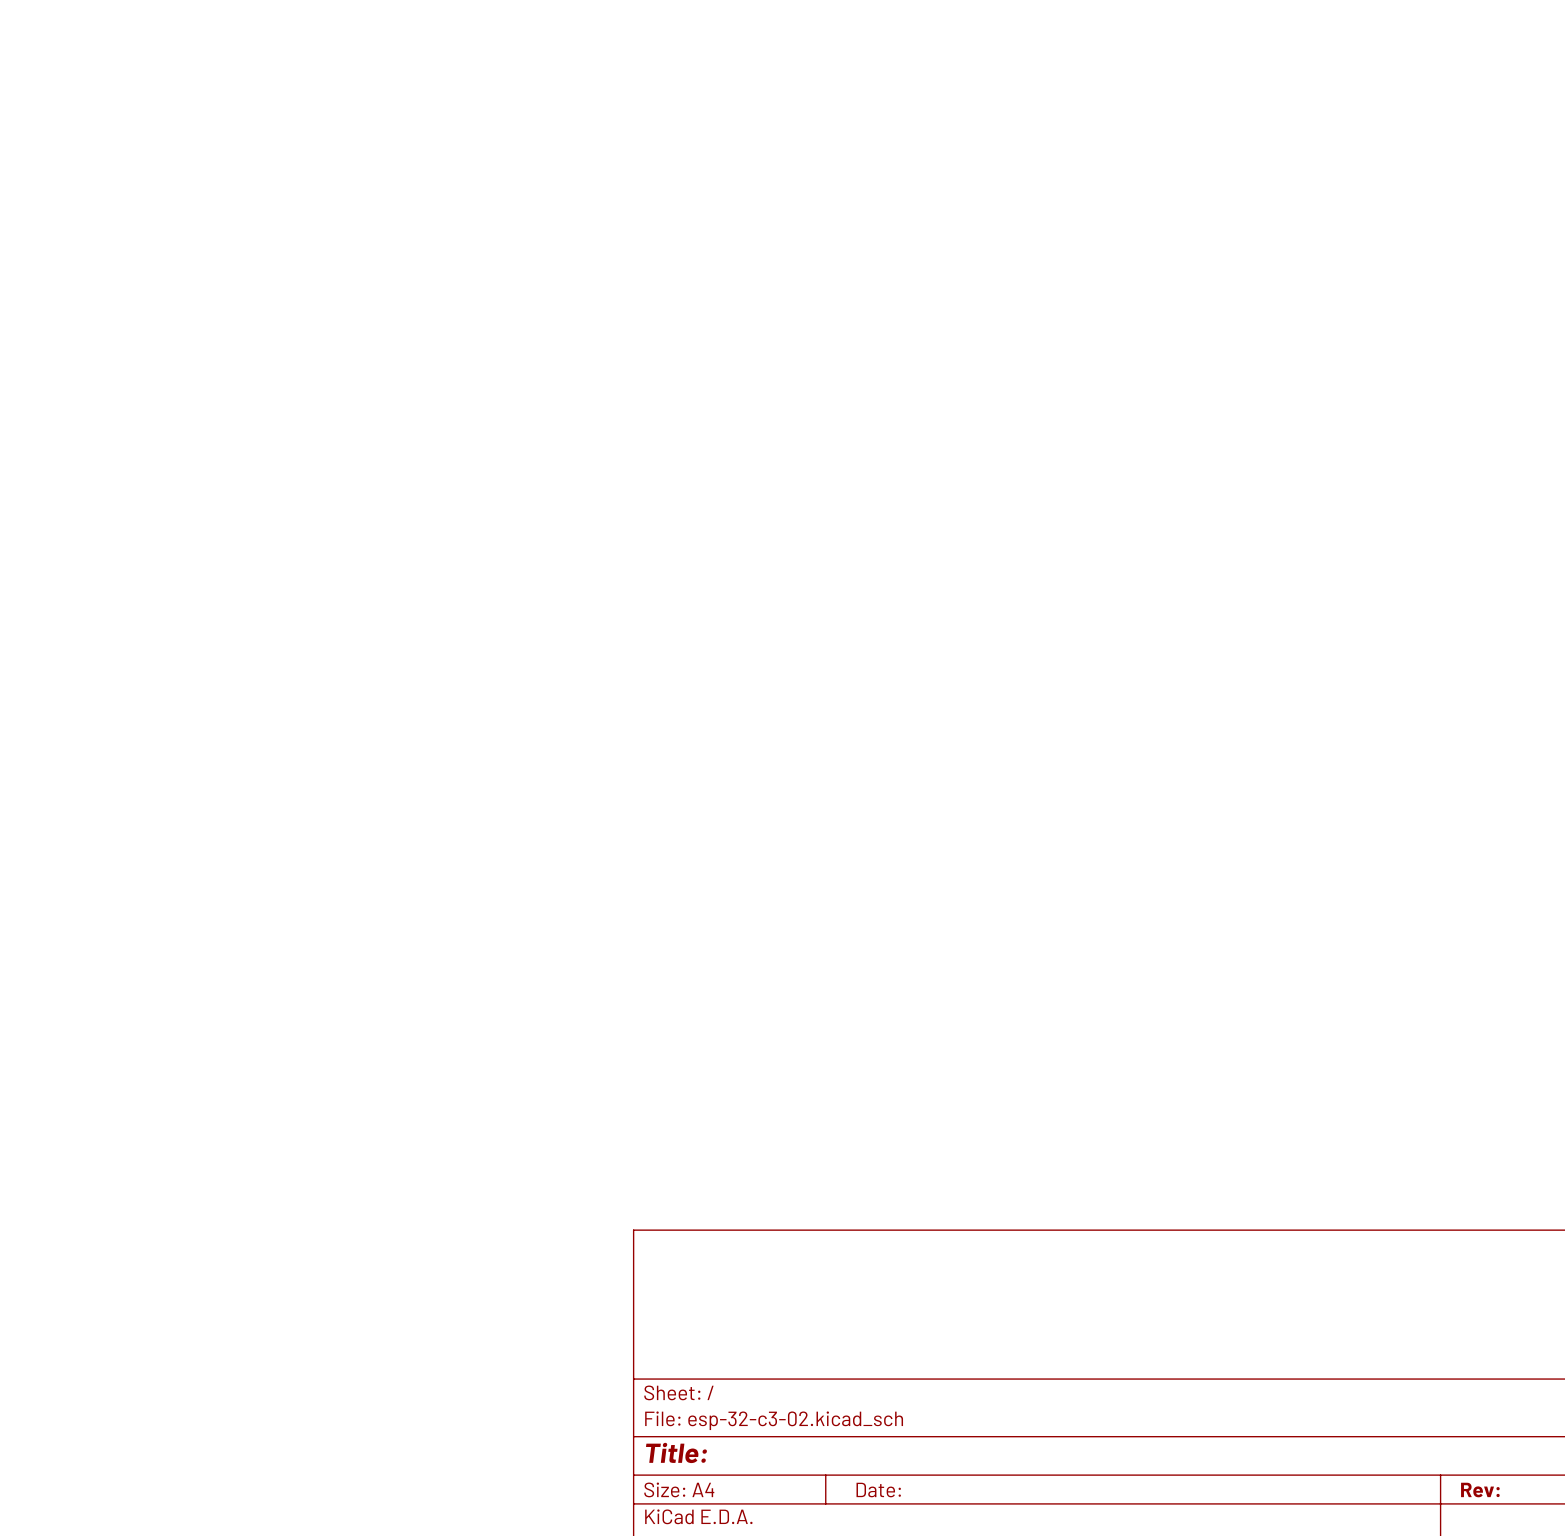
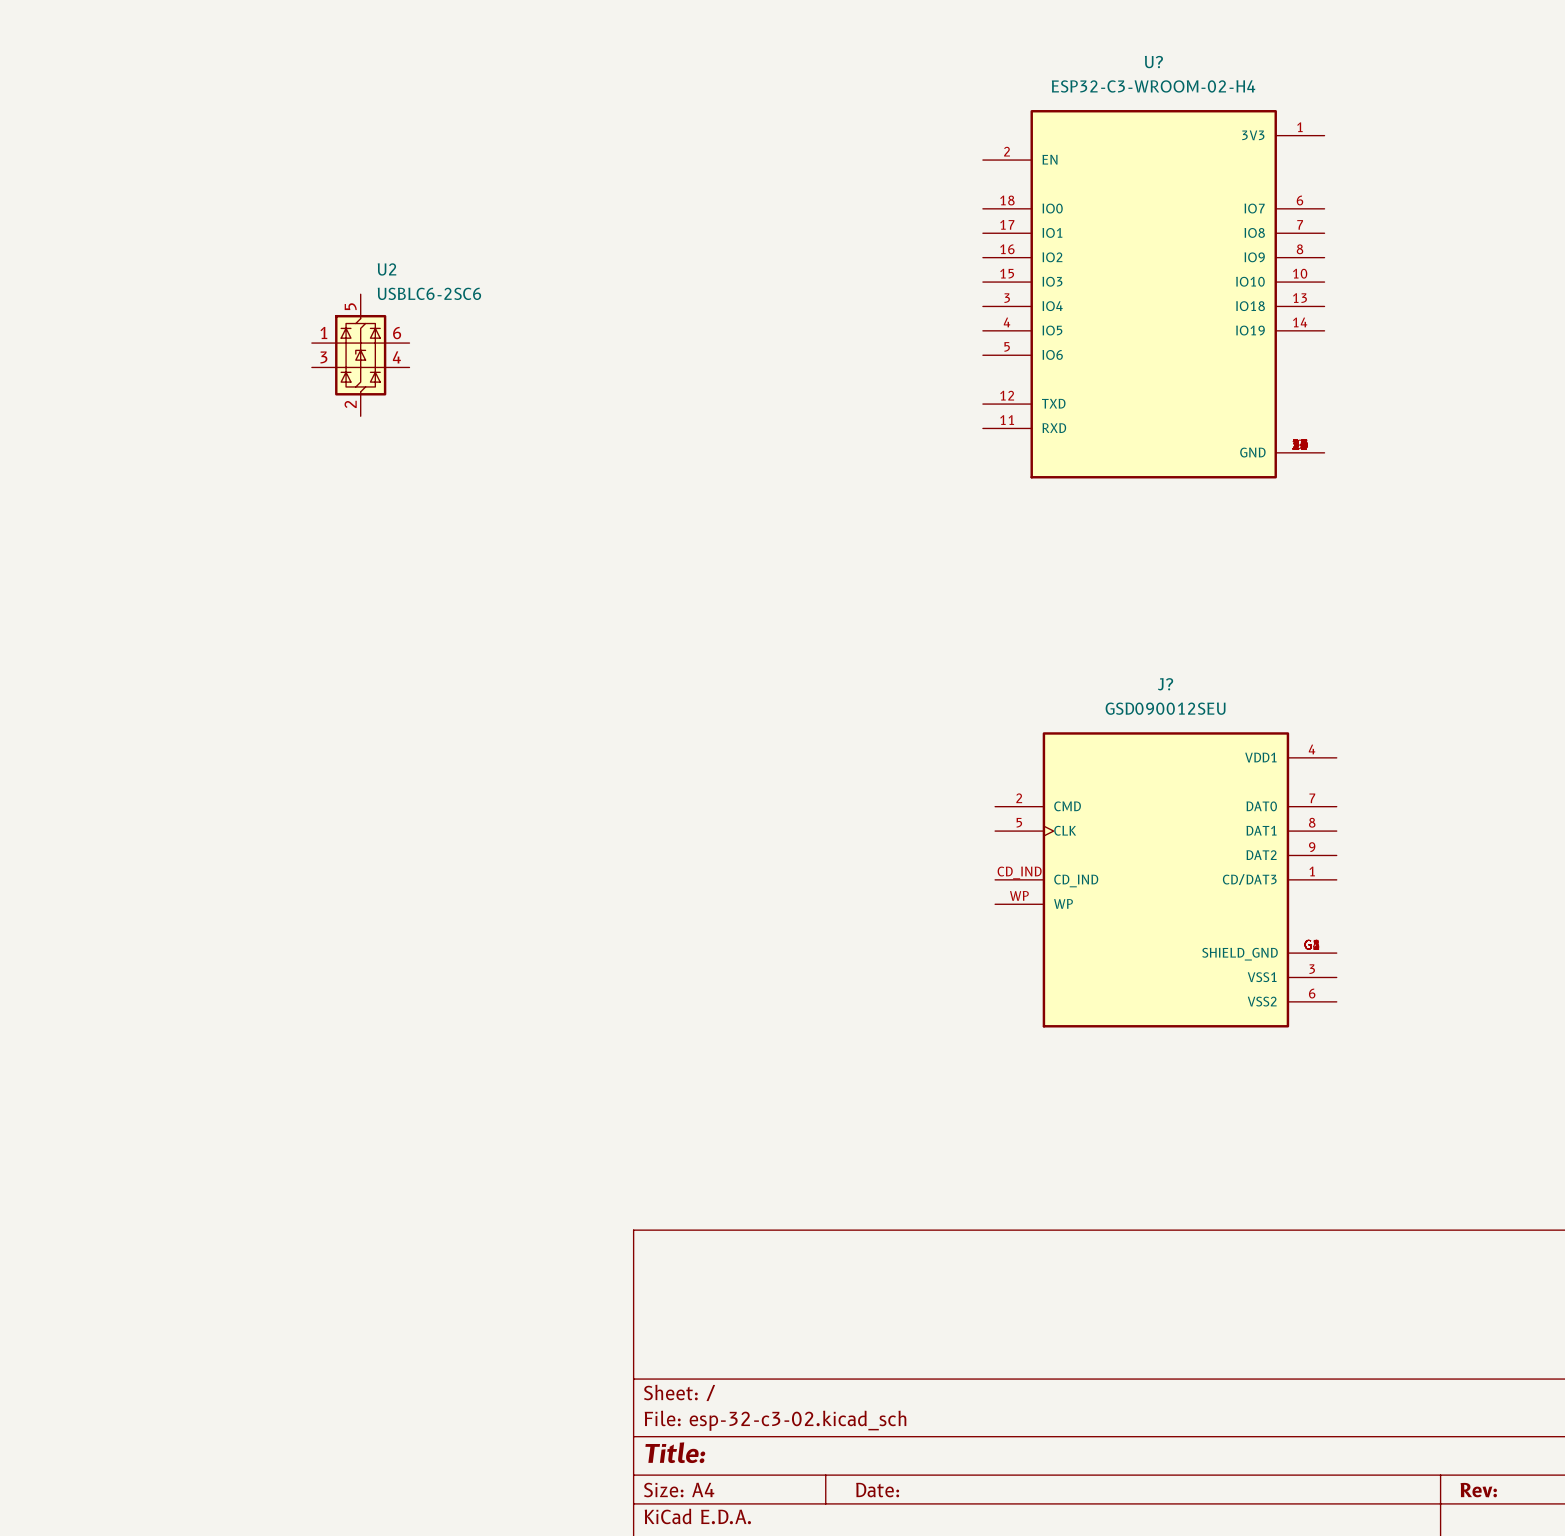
U?: none -> ESP32-C3-WROOM-02-H4 (1153, 294)
U2: none -> USBLC6-2SC6 (360, 355)
J?: none -> GSD090012SEU (1165, 879)

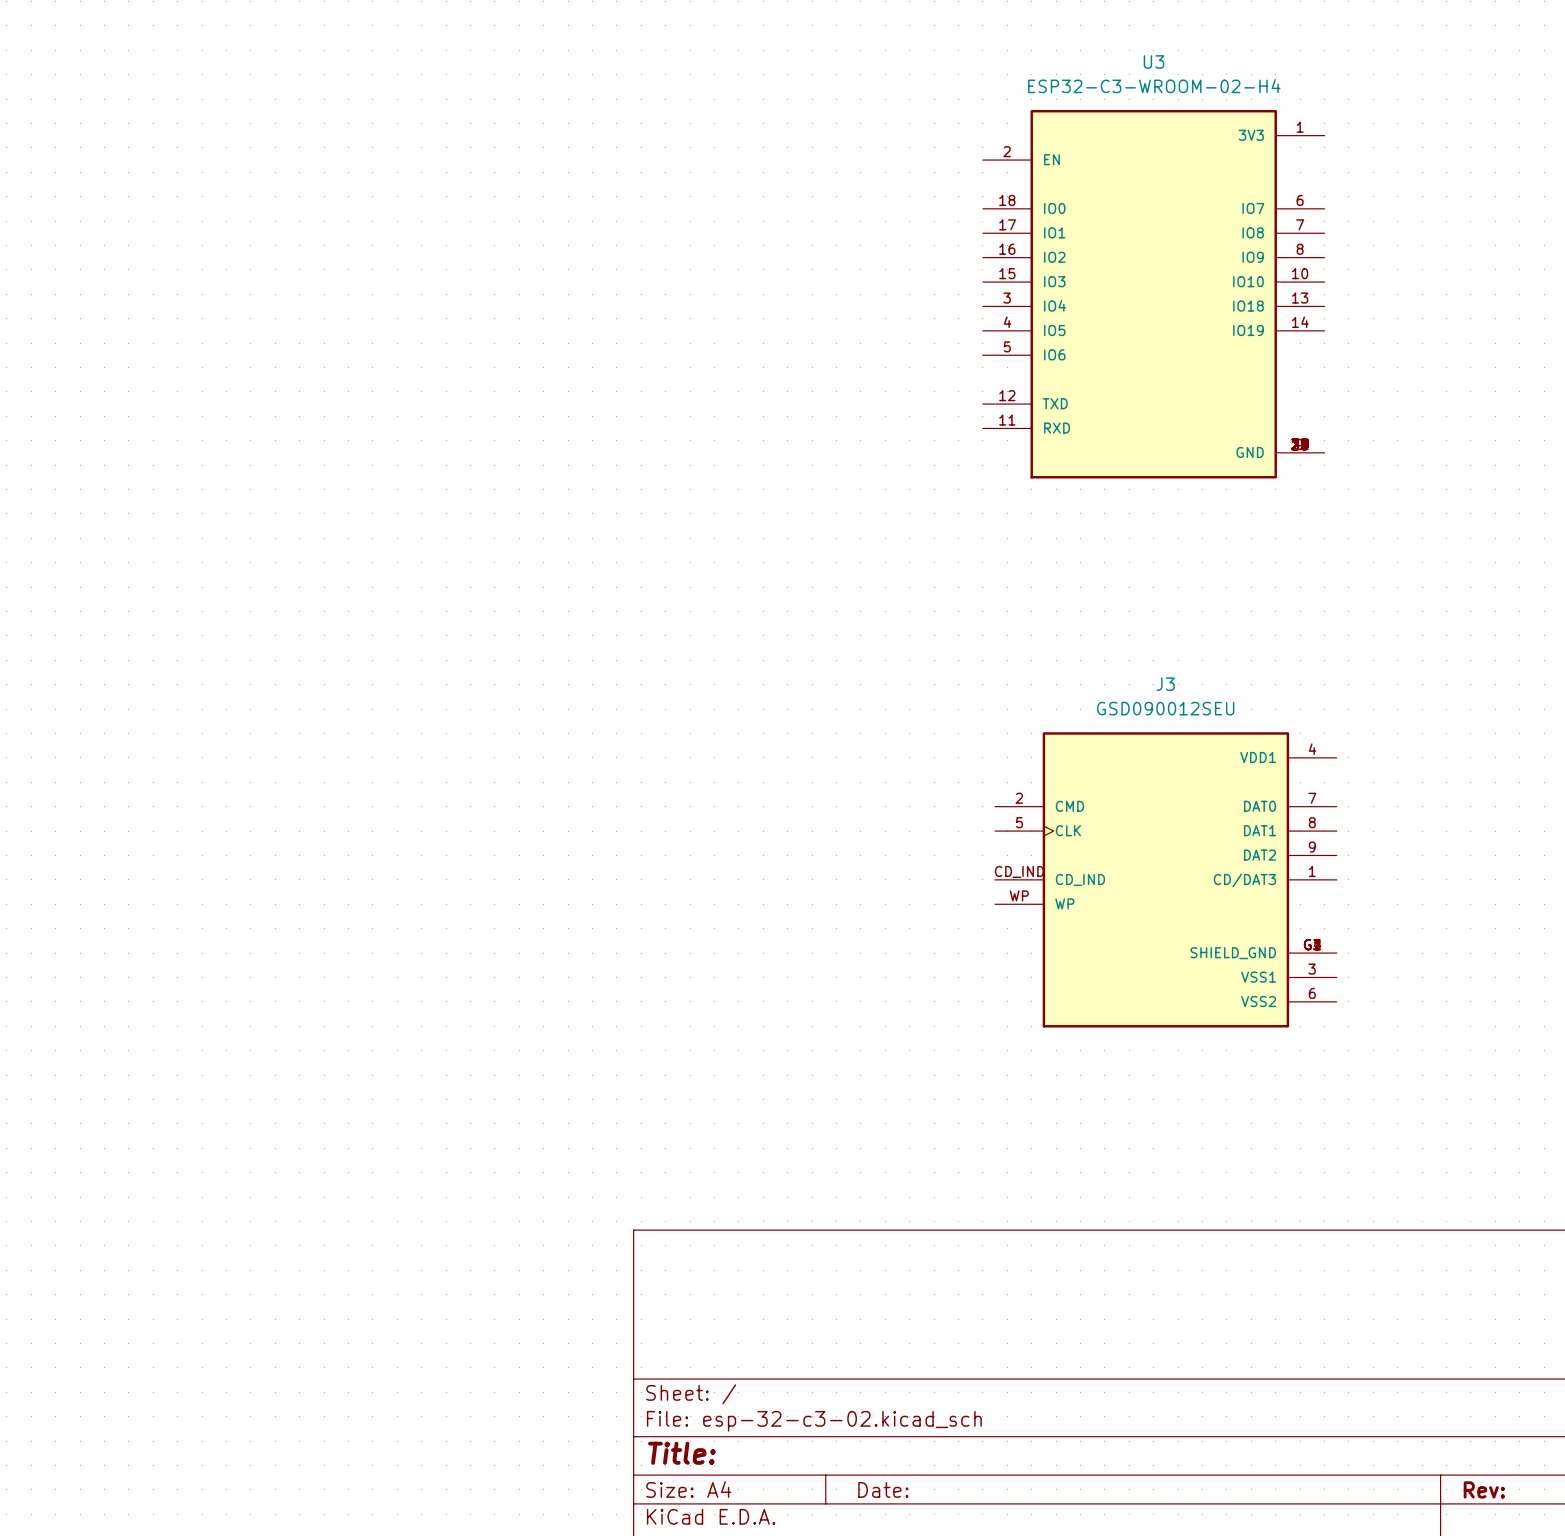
U? name: U? (1153, 62) -> U3 (1154, 61)
U2: USBLC6-2SC6 (360, 355) -> none
J? name: J? (1165, 684) -> J3 (1165, 684)

